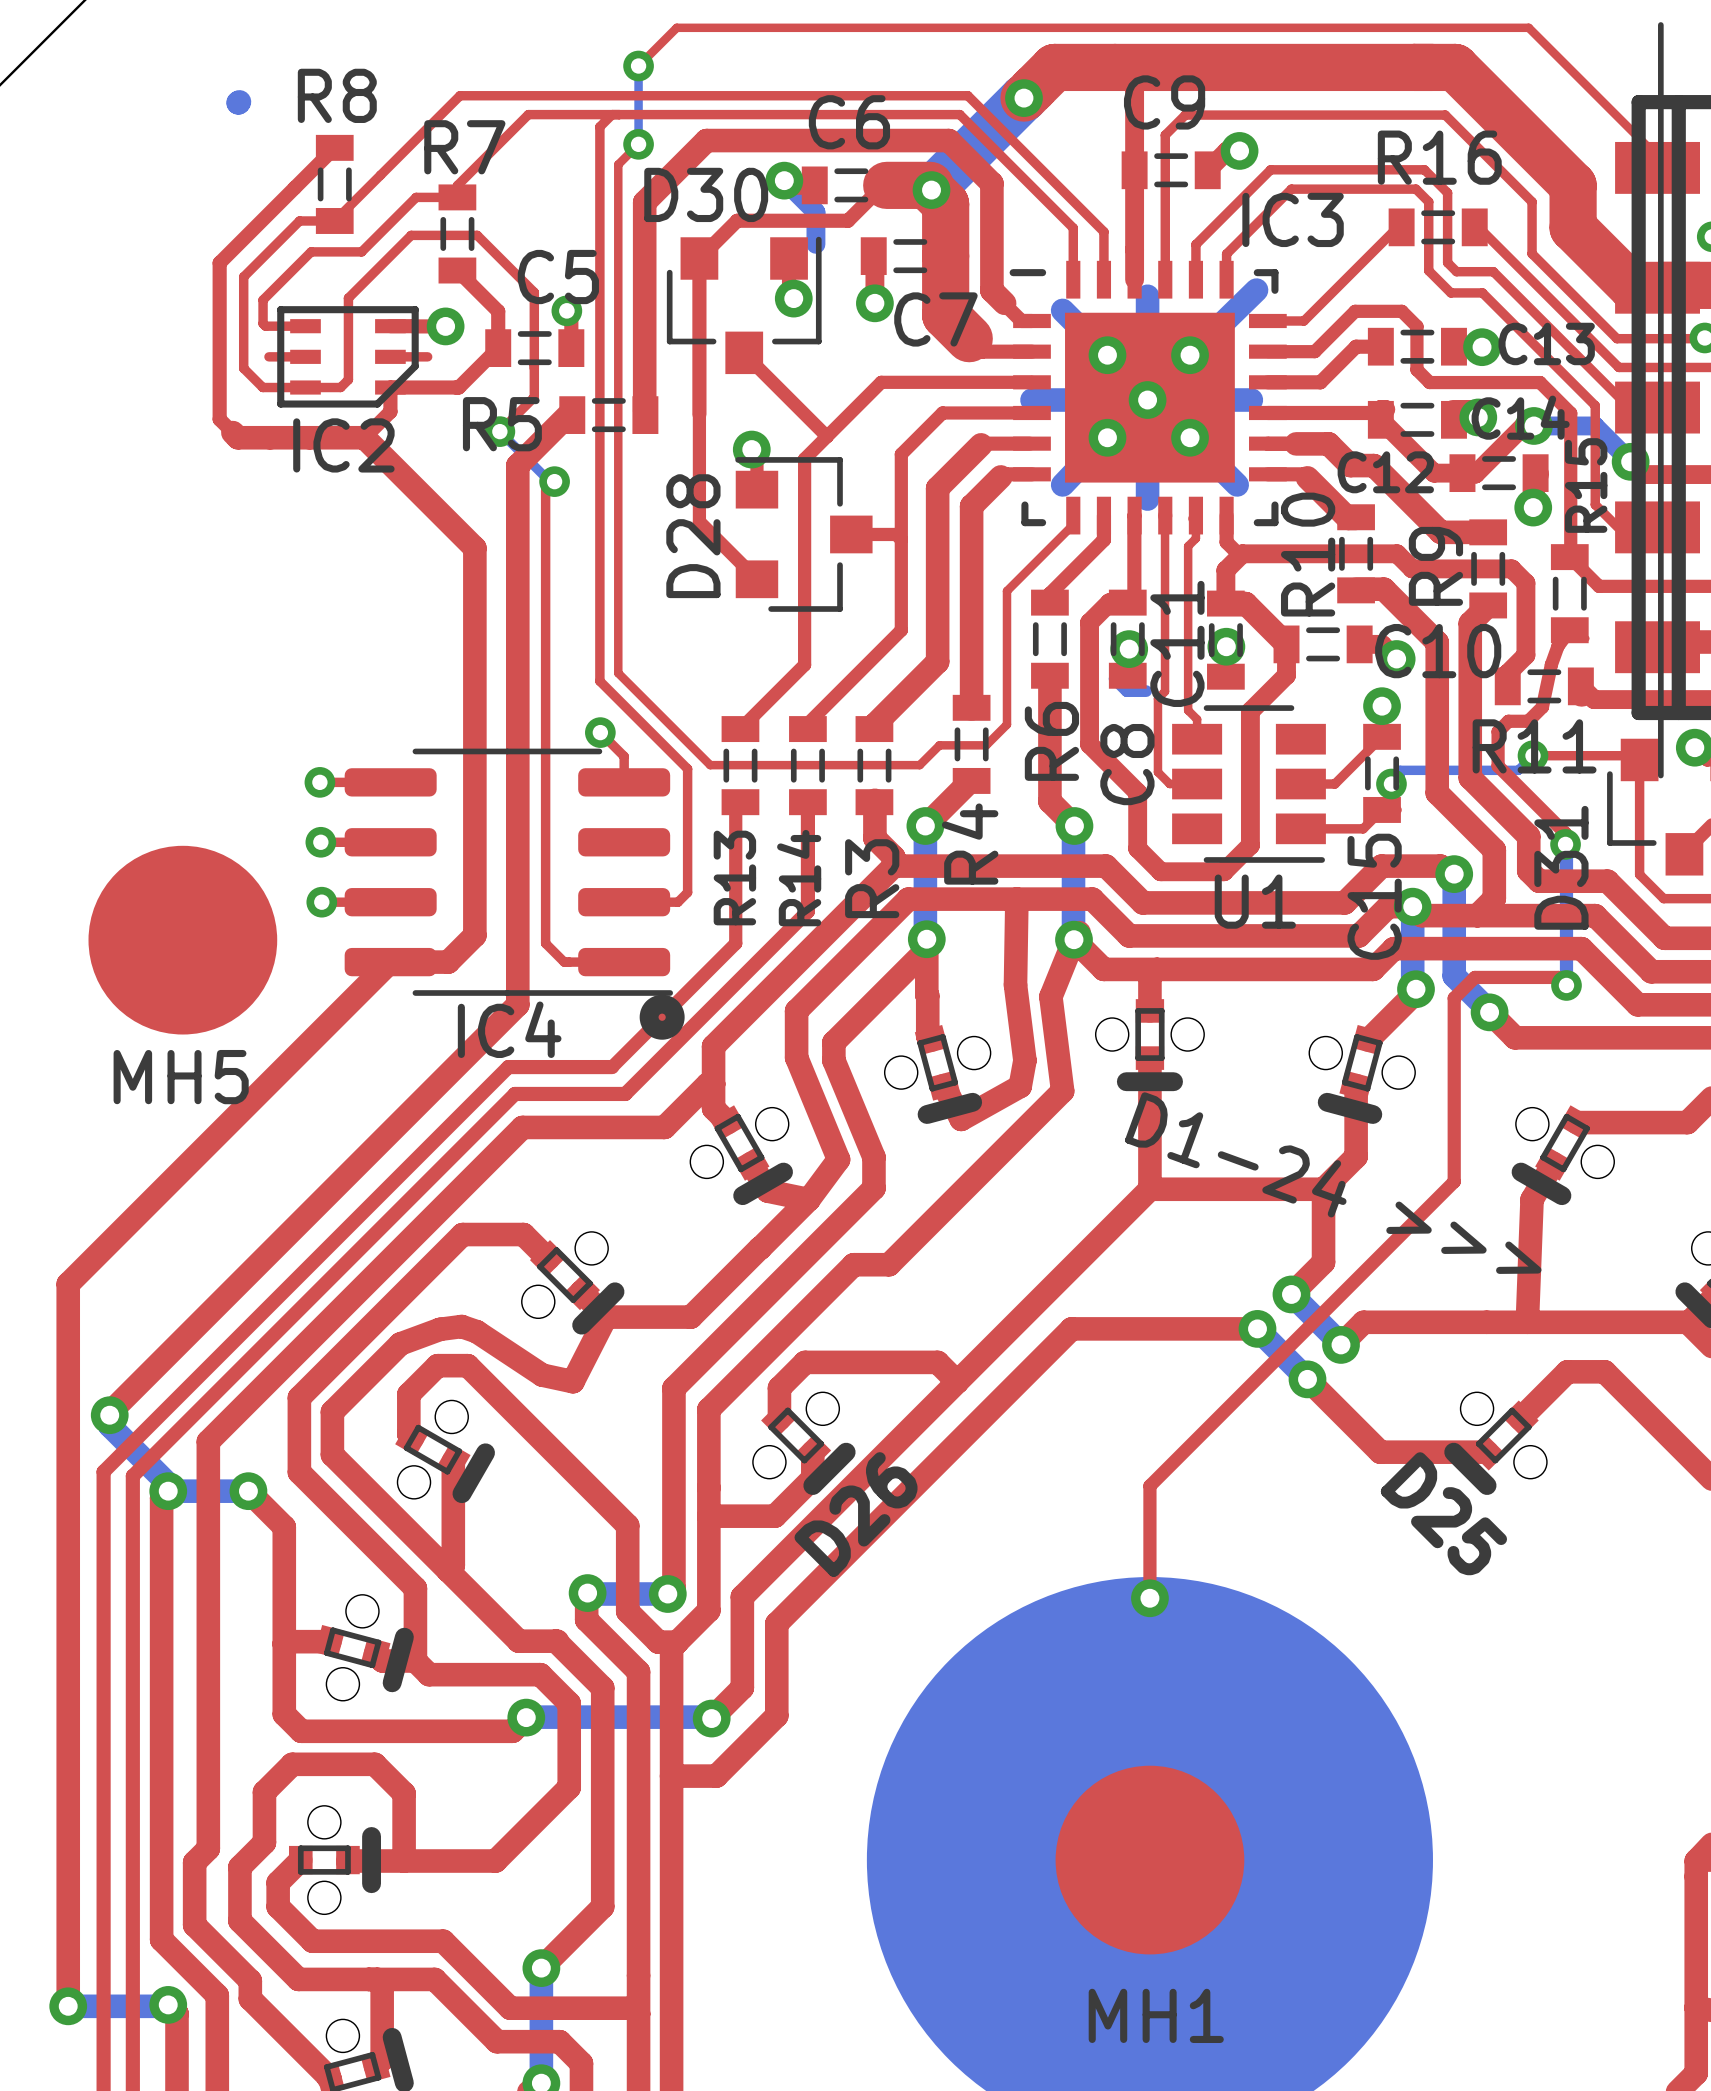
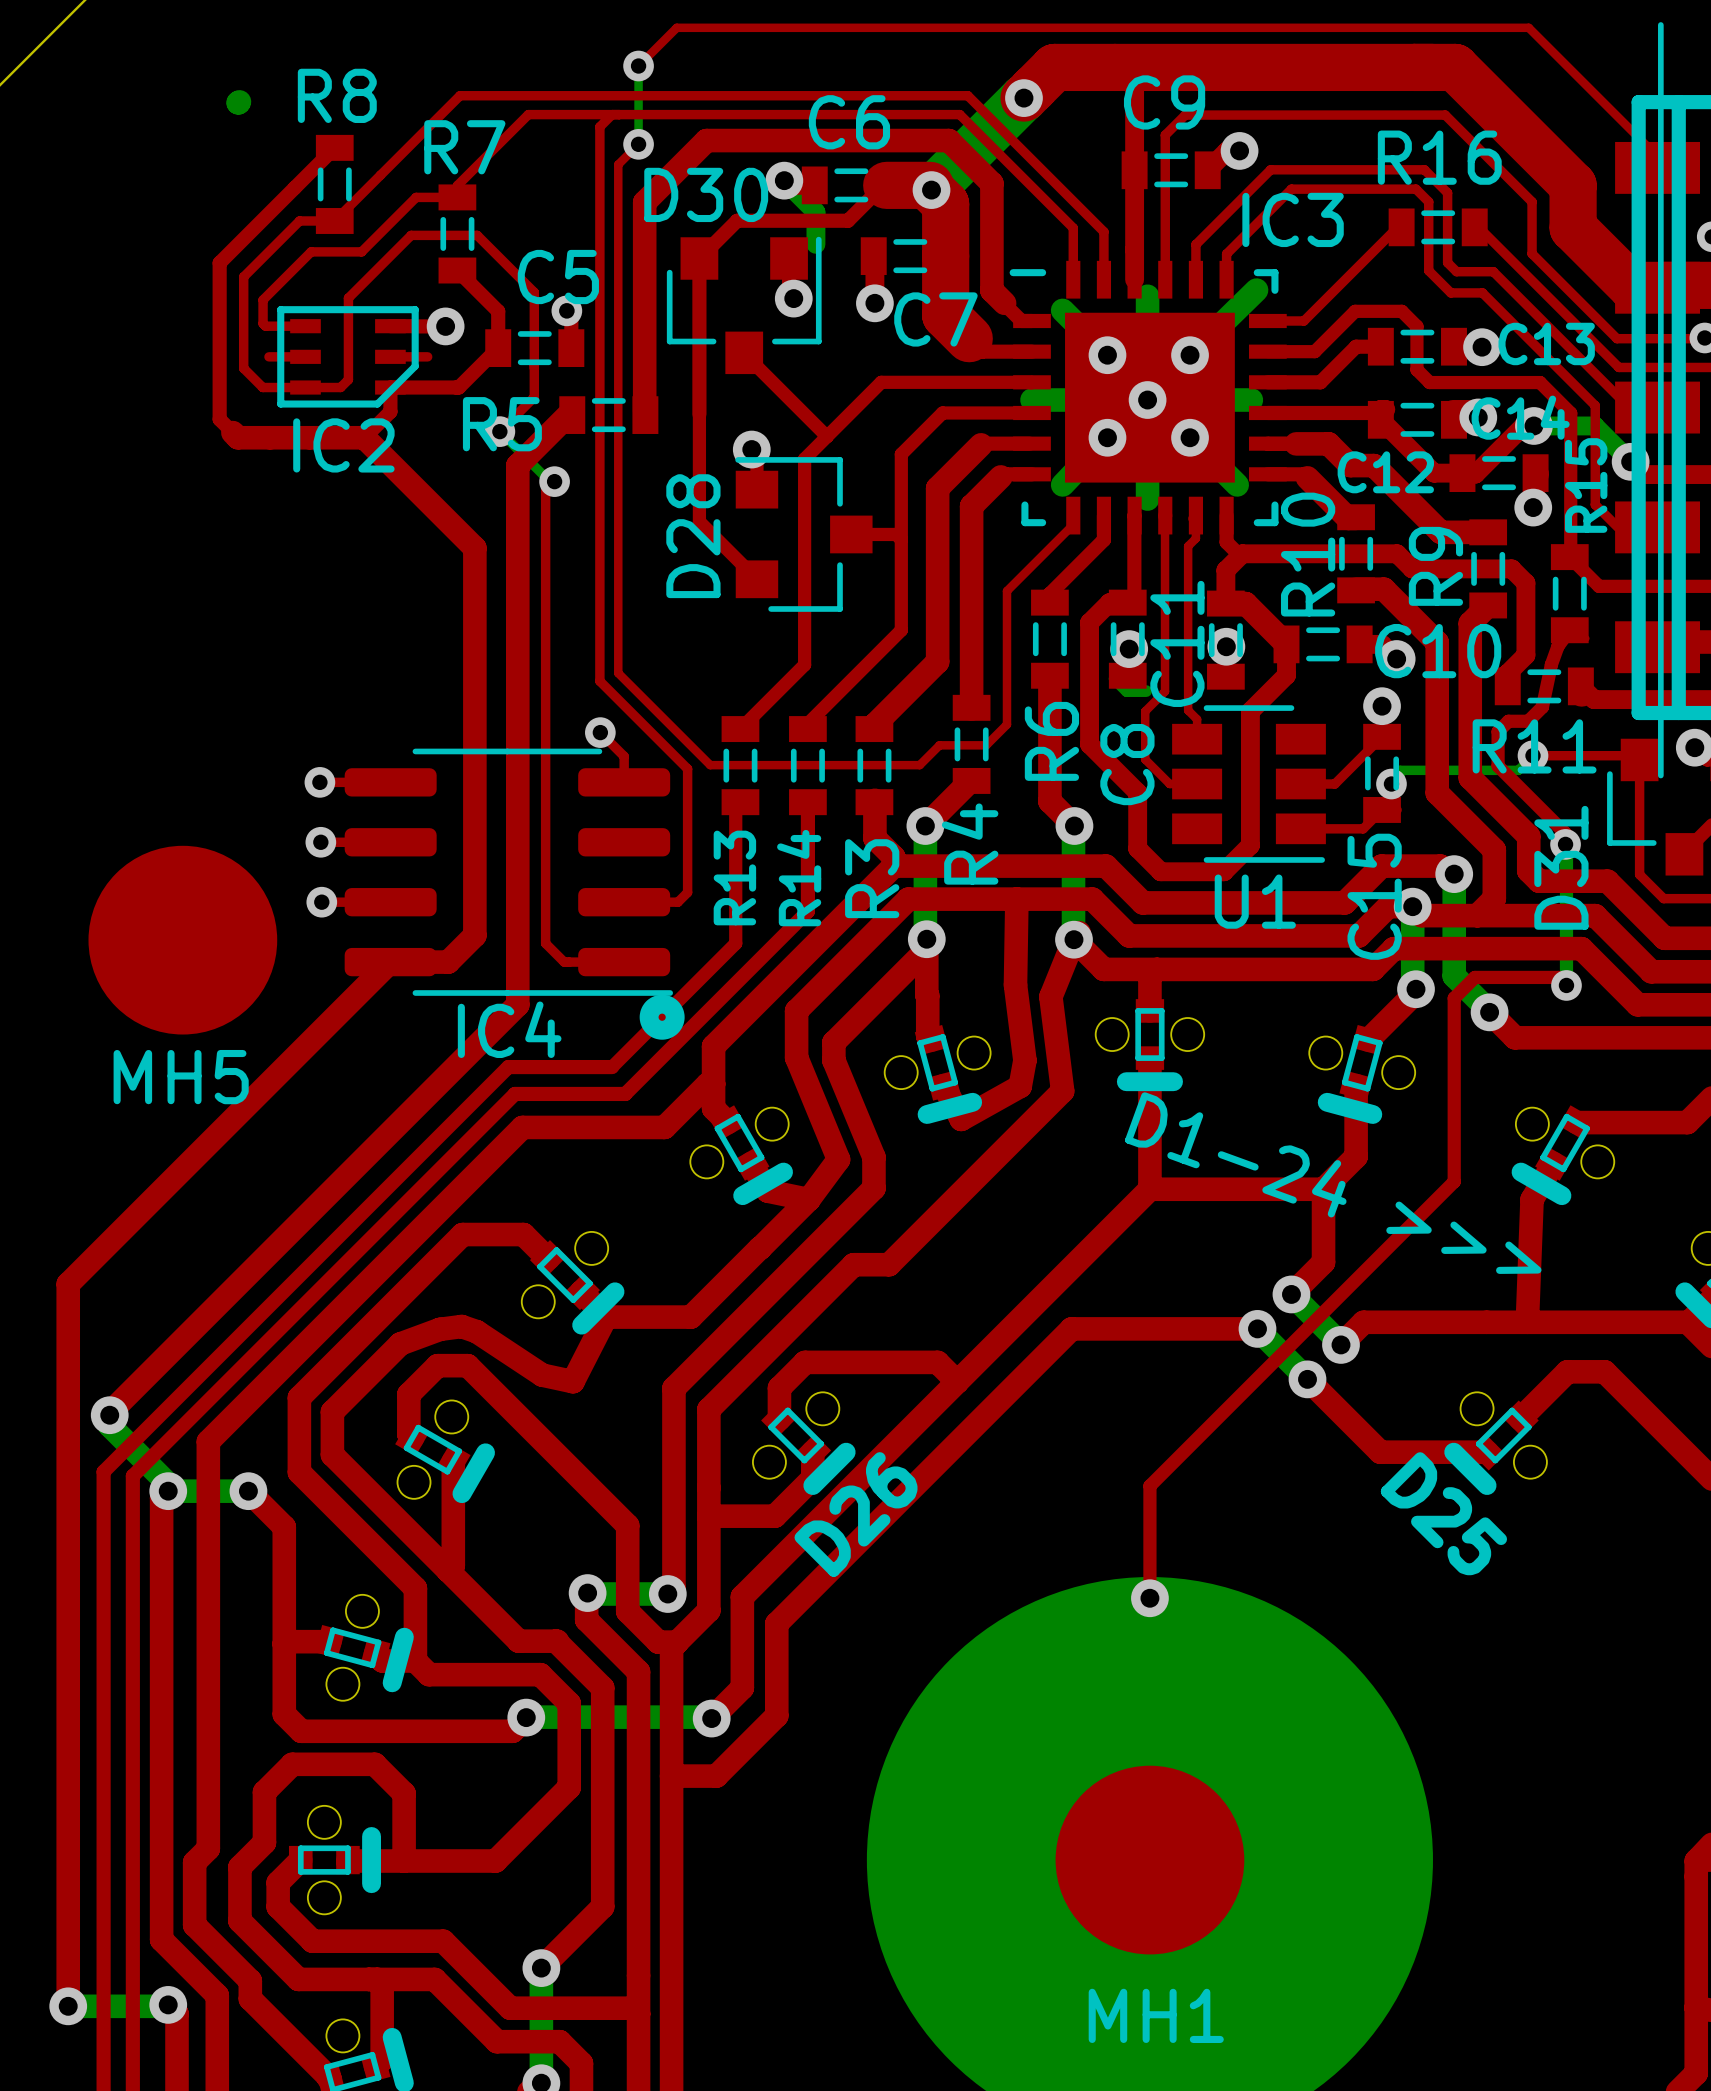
top track: (1157, 698) (1157, 772) -> (1157, 698) (1145, 711) (1145, 759) (1157, 772)

